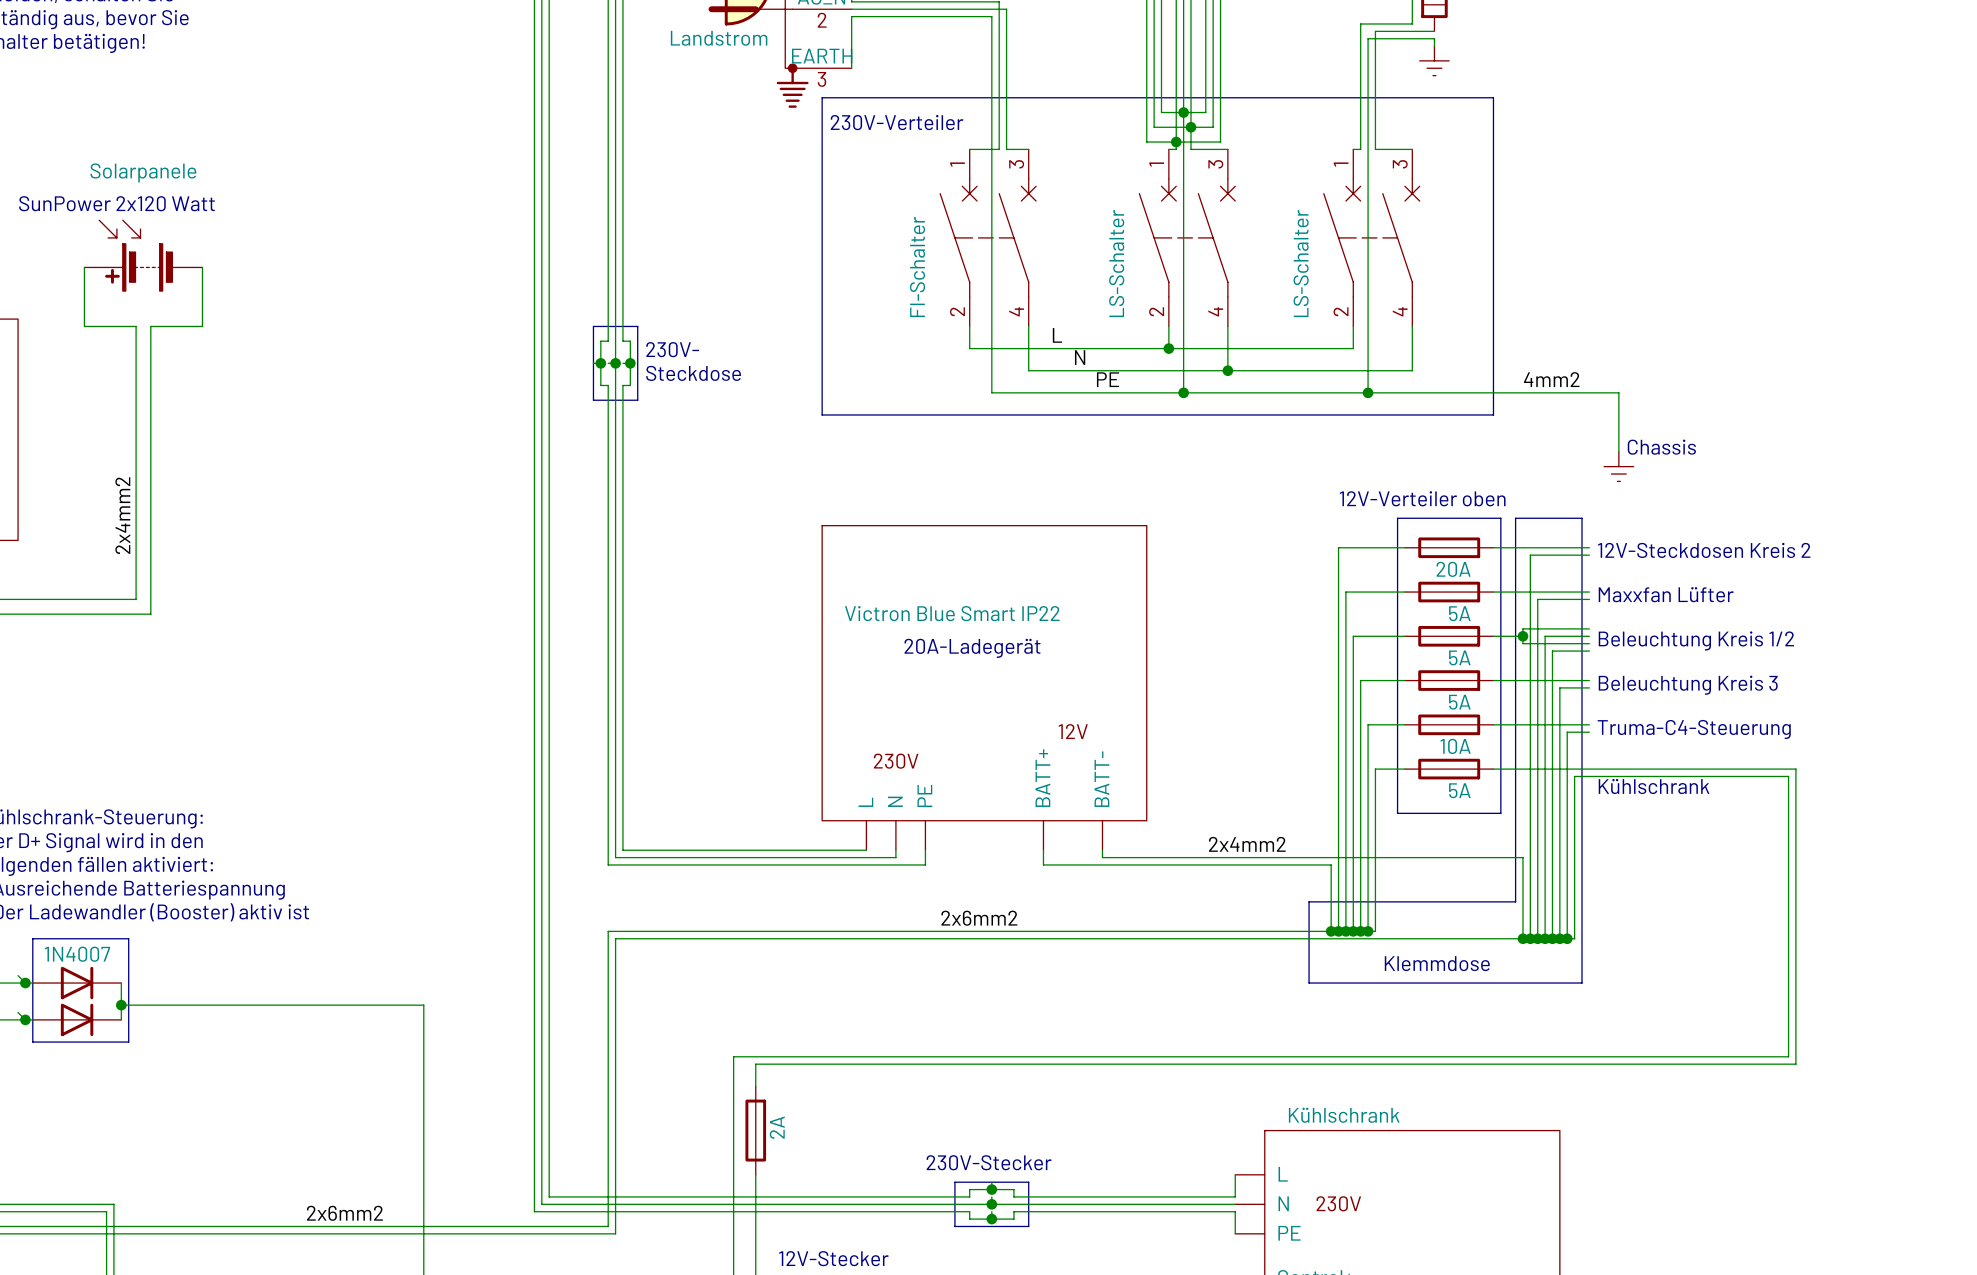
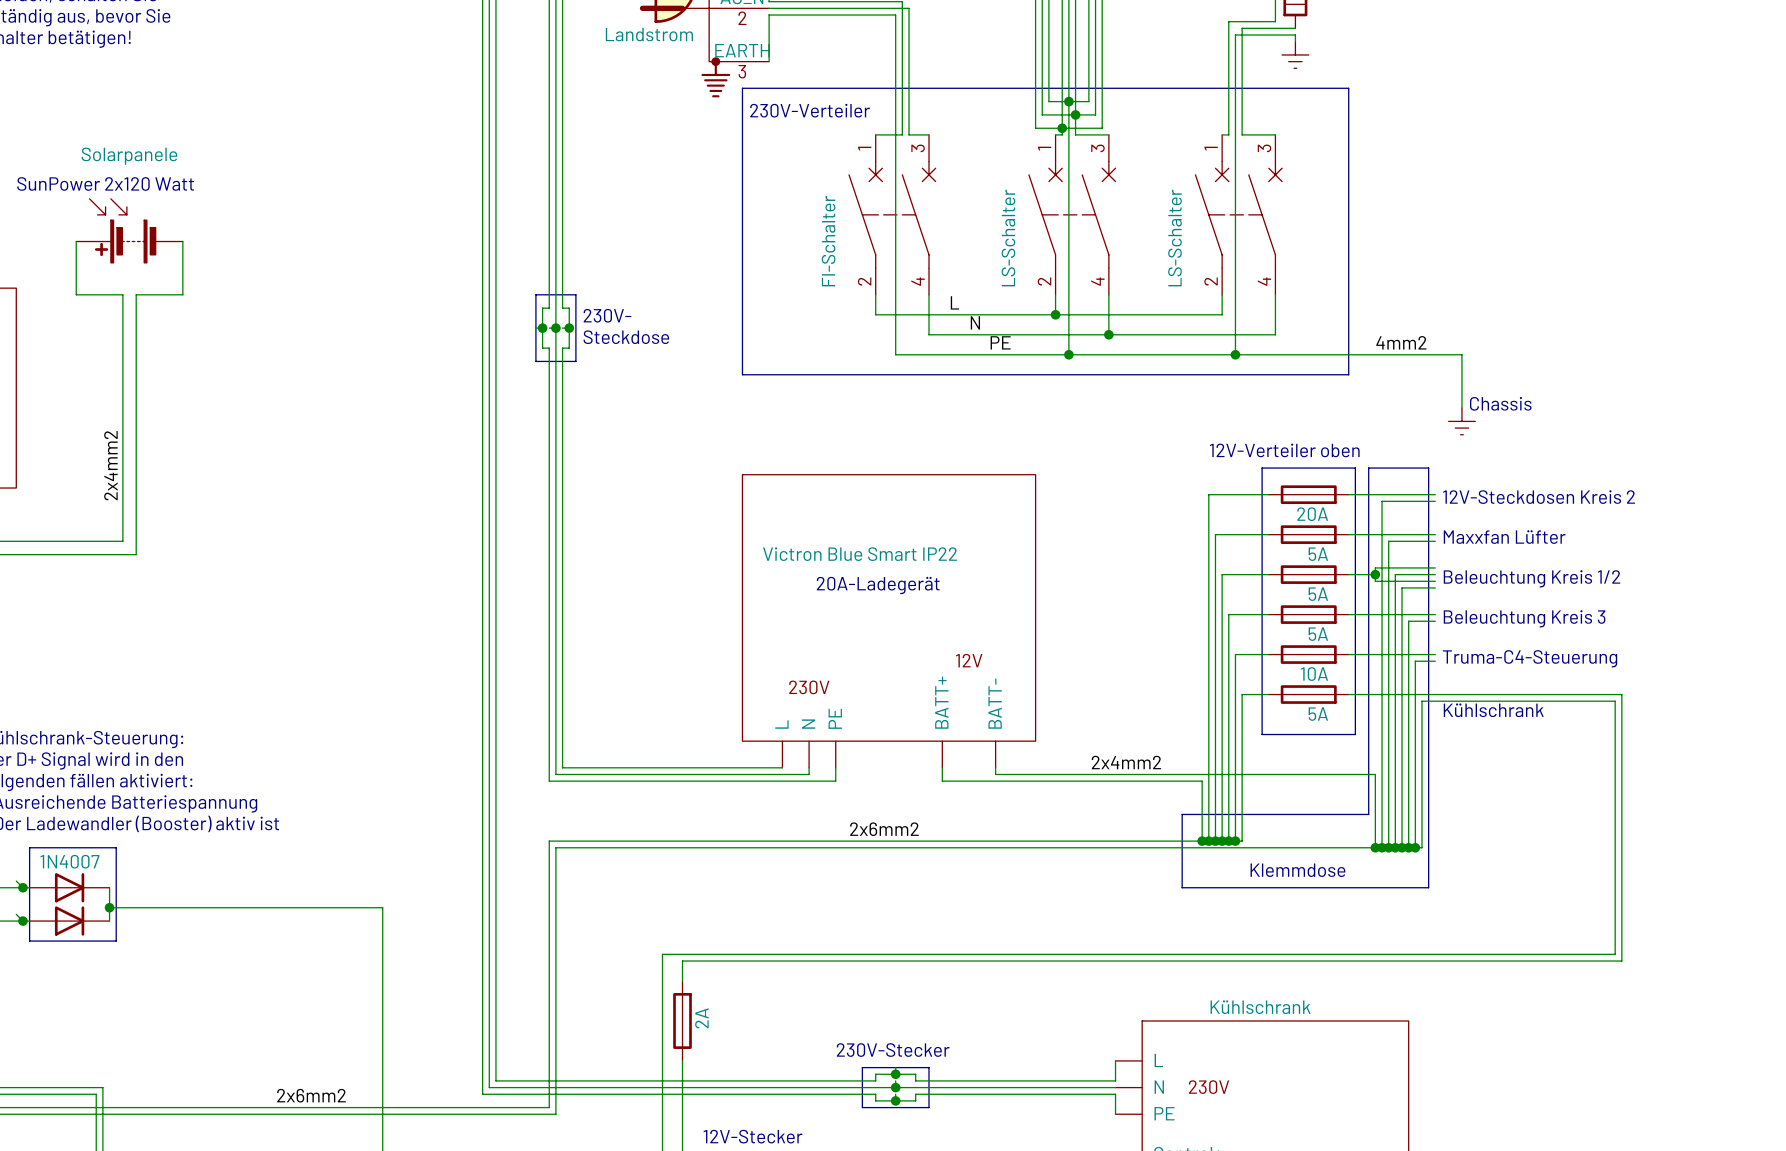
part value position: Kühlschrank (1344, 1115) -> Kühlschrank (1260, 1007)

